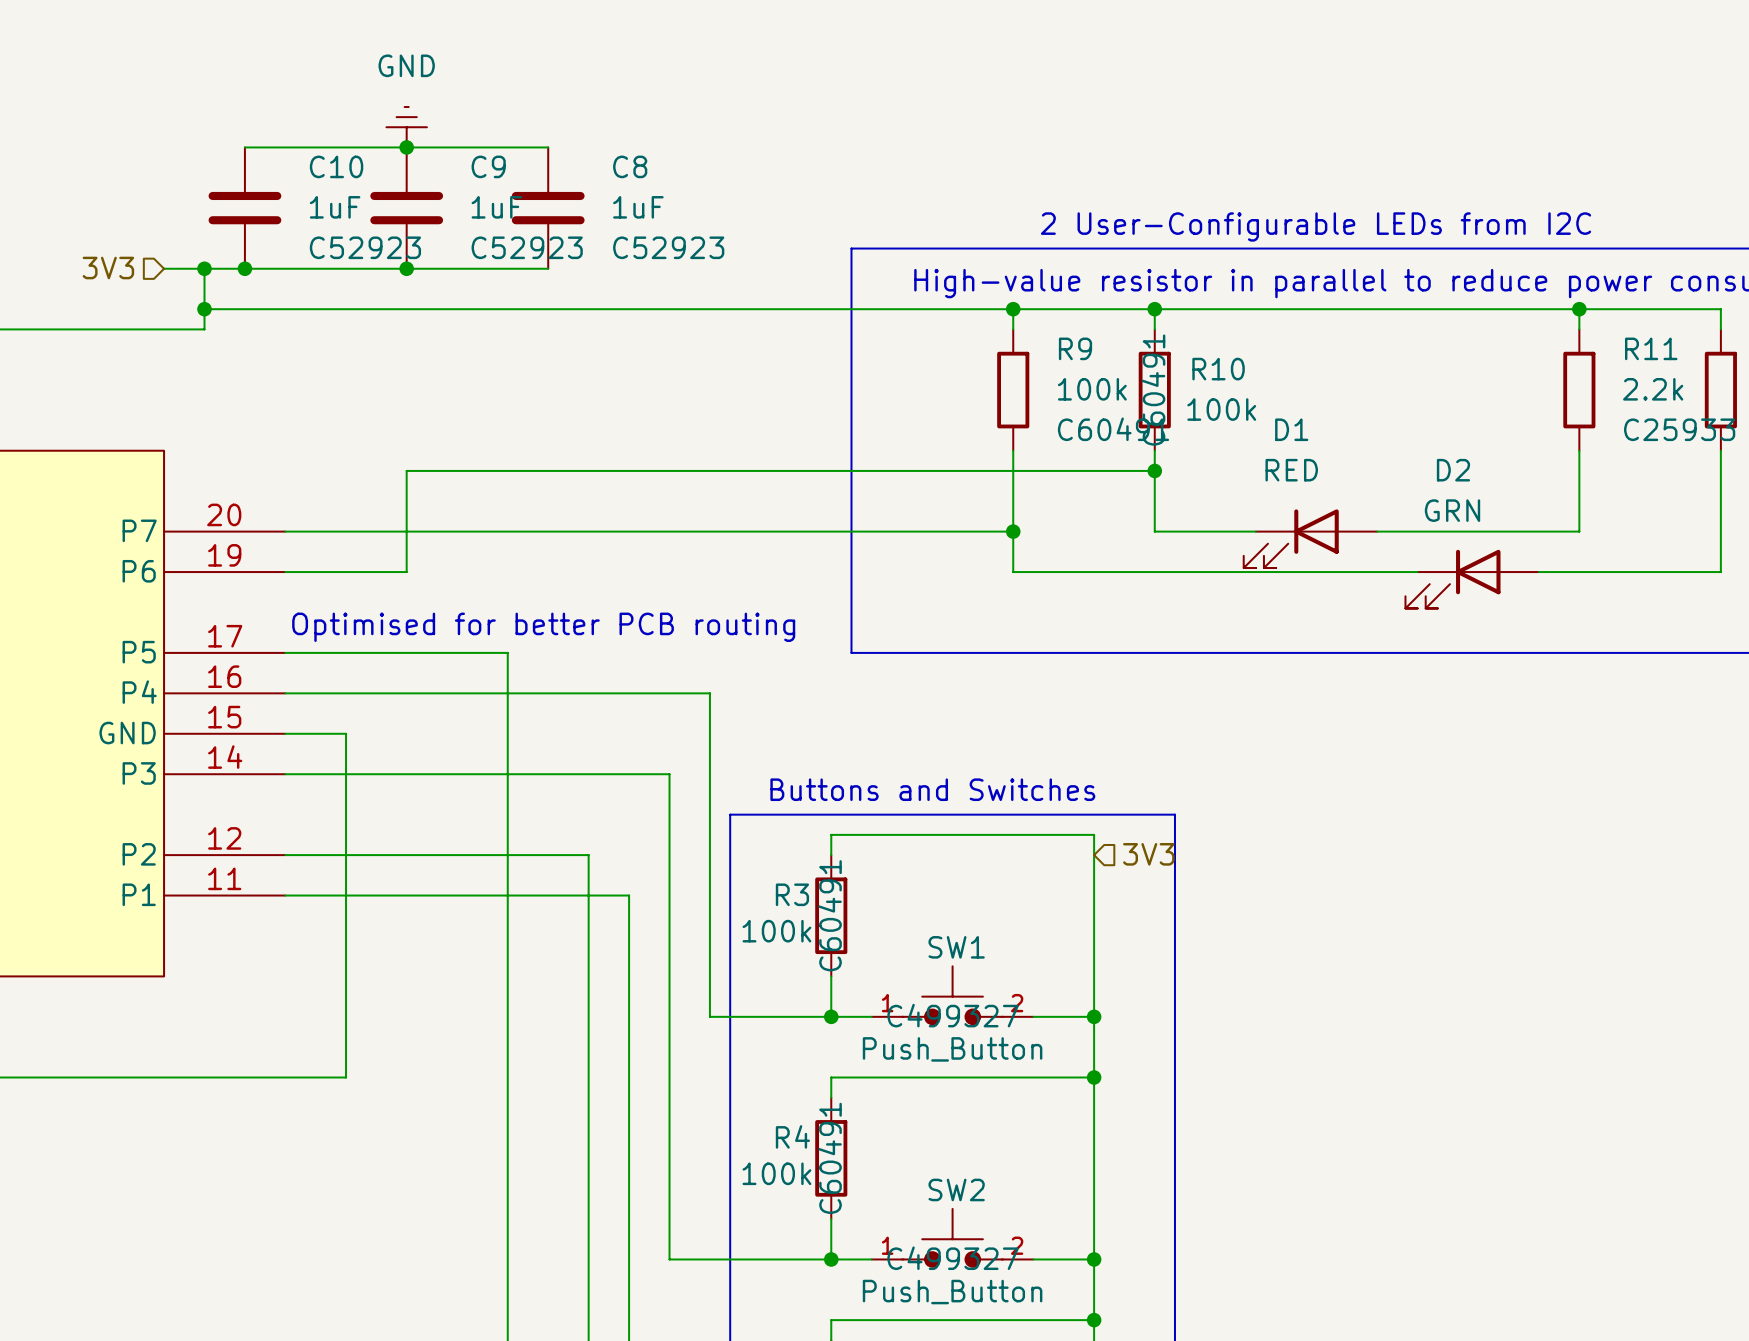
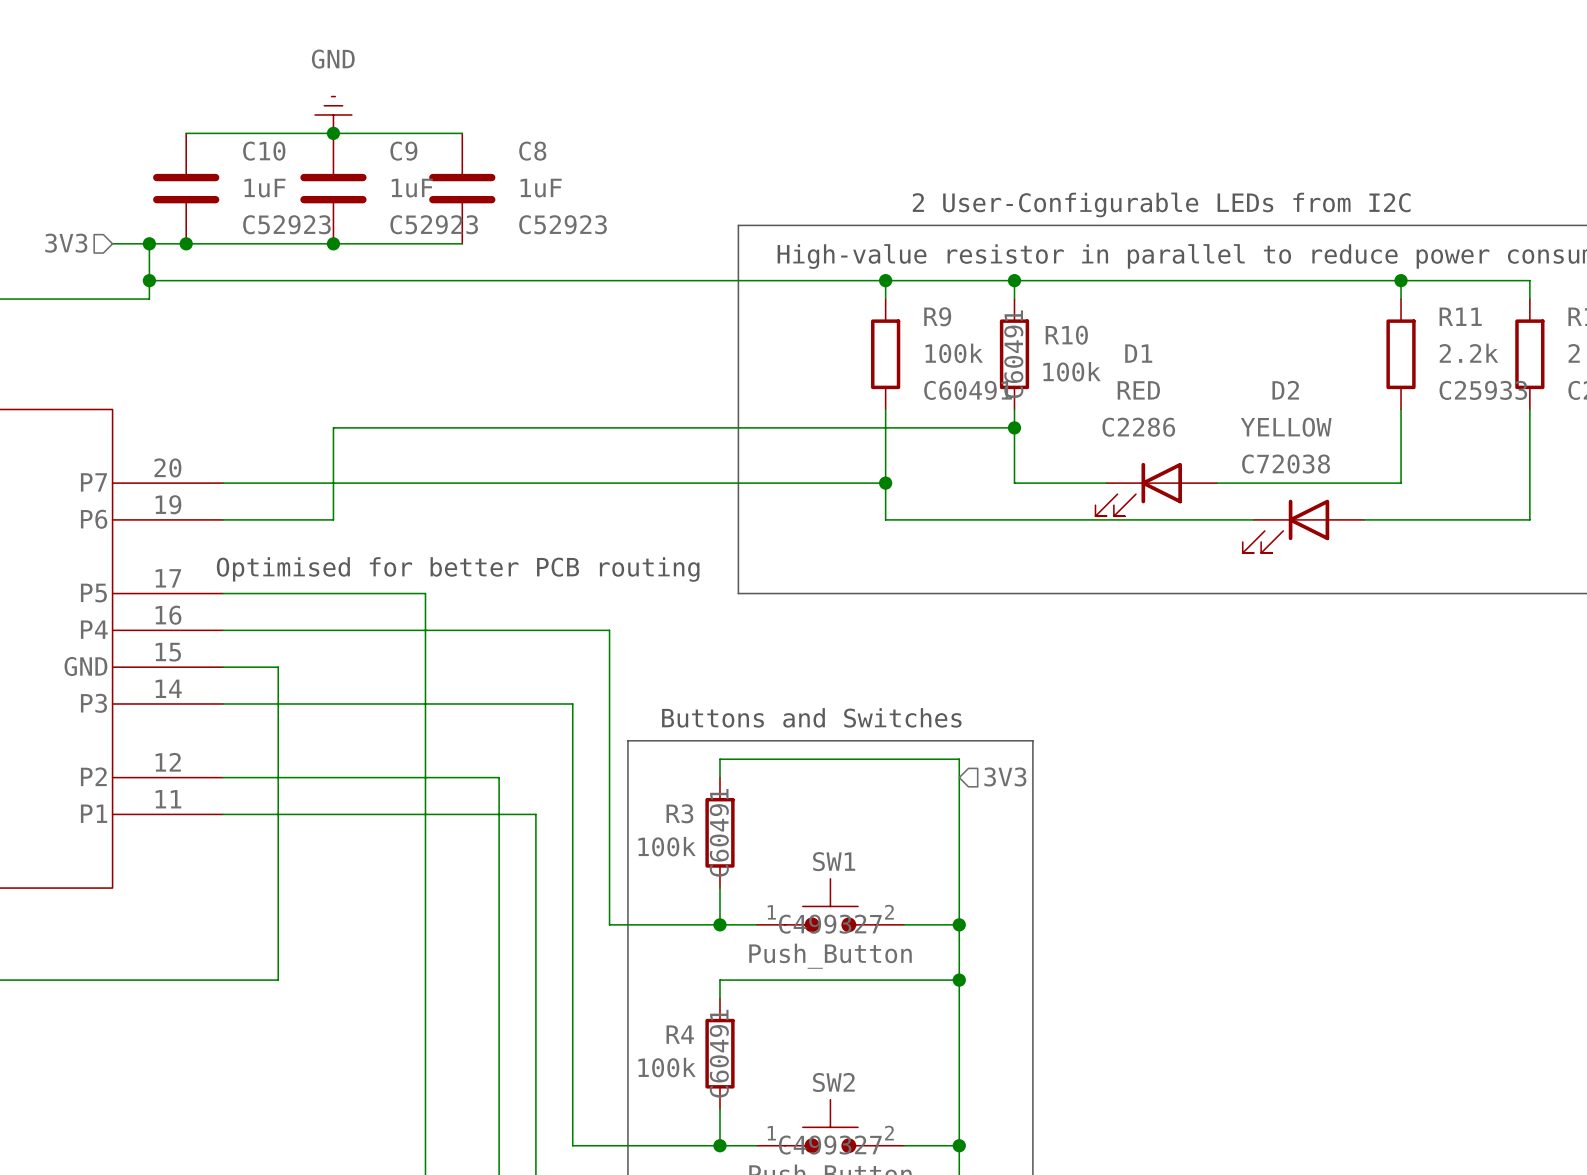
D1 name position: D1 (1291, 429) -> D1 (1138, 353)
D1 text: none -> C2286 (1138, 427)
D1 value position: RED (1291, 470) -> RED (1138, 390)
D2 name position: D2 (1453, 470) -> D2 (1285, 390)
D2 text: none -> C72038 (1286, 464)
D2 value: GRN (1452, 510) -> YELLOW (1286, 427)

